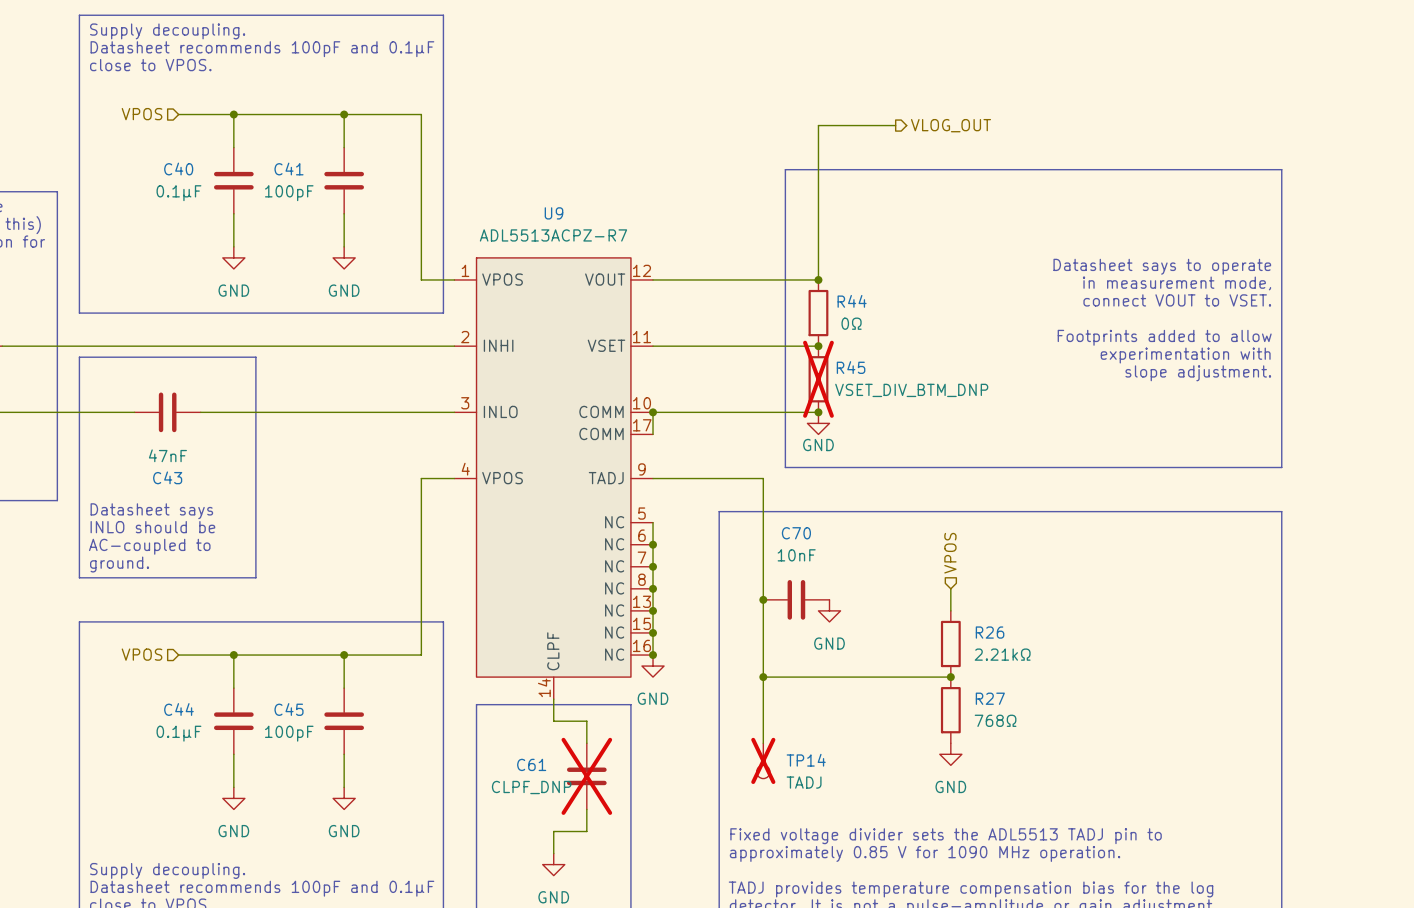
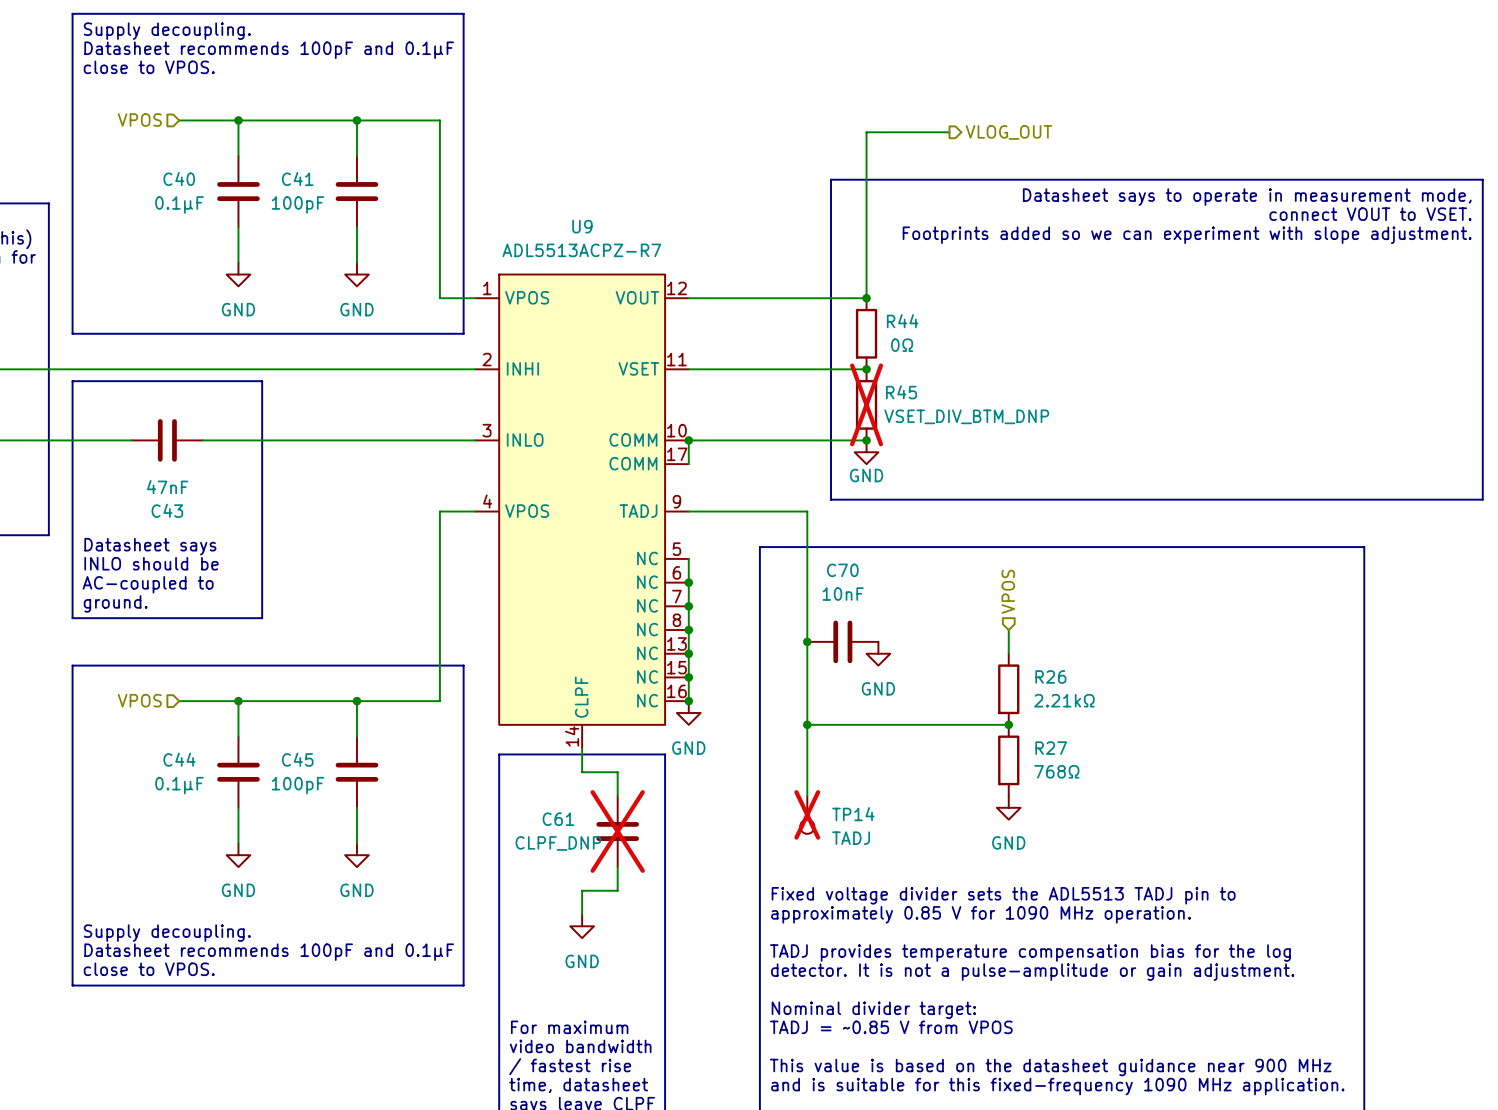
line: (1281, 169) (1281, 467) -> (1364, 179) (1482, 179) (1482, 499) (1364, 499)
text: none -> Datasheet says to operate in measurement mode, (1247, 197)
text: none -> Footprints added so we can experiment with slope adjustment. (1187, 235)
text: Datasheet says to operate (1162, 266) -> none
text: in measurement mode, (1177, 283) -> none
text position: connect VOUT to VSET. (1177, 300) -> connect VOUT to VSET. (1370, 214)
text: Footprints added to allow (1164, 337) -> none
text: experimentation with (1185, 355) -> none
text: slope adjustment. (1198, 373) -> none

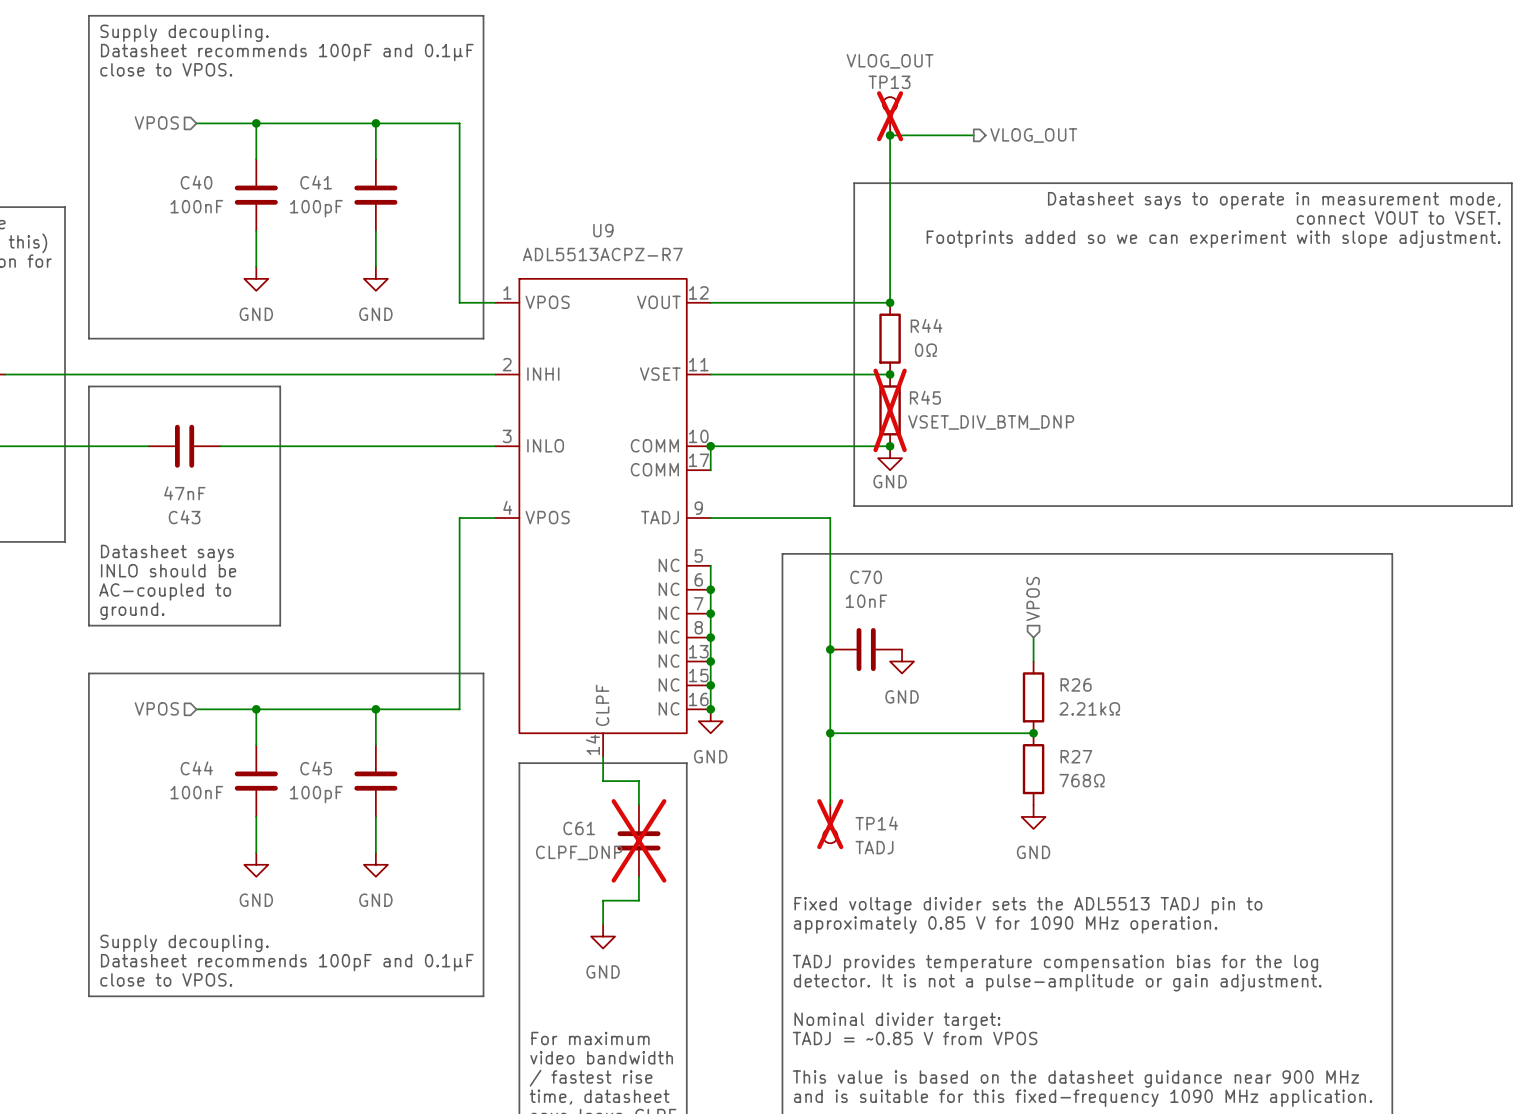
TP13: none -> VLOG_OUT (890, 116)
junction: none -> (890, 135)
C40 value: 0.1µF (179, 204) -> 100nF (196, 206)
C44 value: 0.1µF (179, 785) -> 100nF (196, 792)

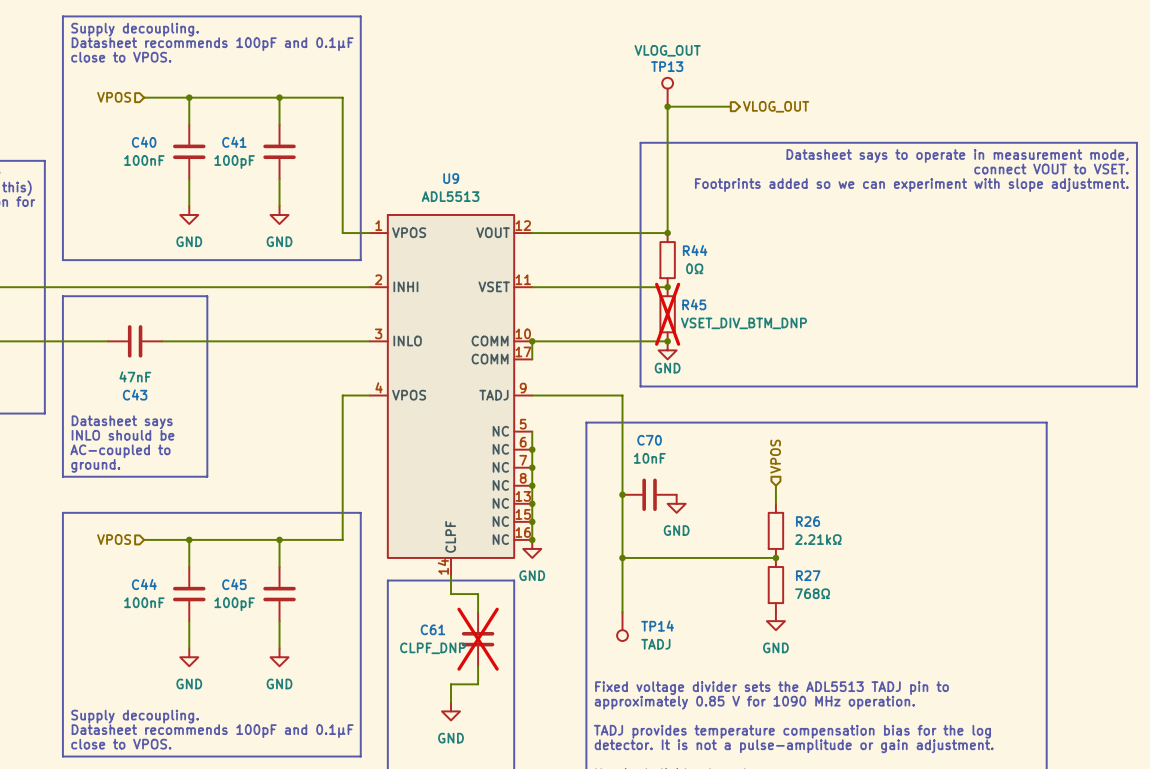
TP13 do-not-place cross: (890, 116) -> none
U9 value: ADL5513ACPZ-R7 (602, 254) -> ADL5513 (450, 196)
TP14 do-not-place cross: (830, 824) -> none

